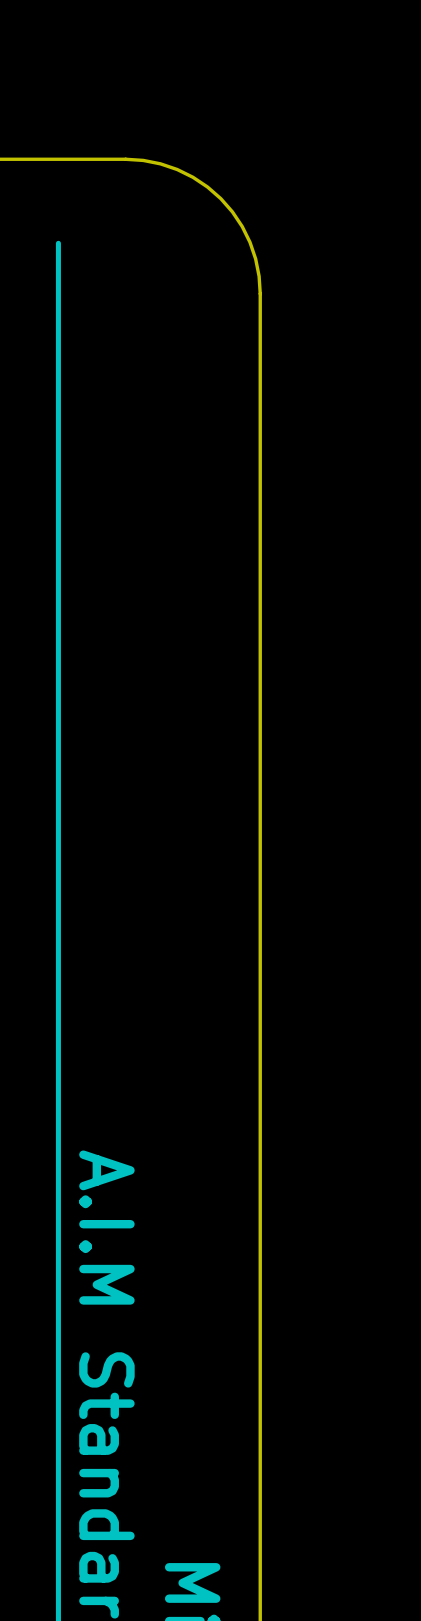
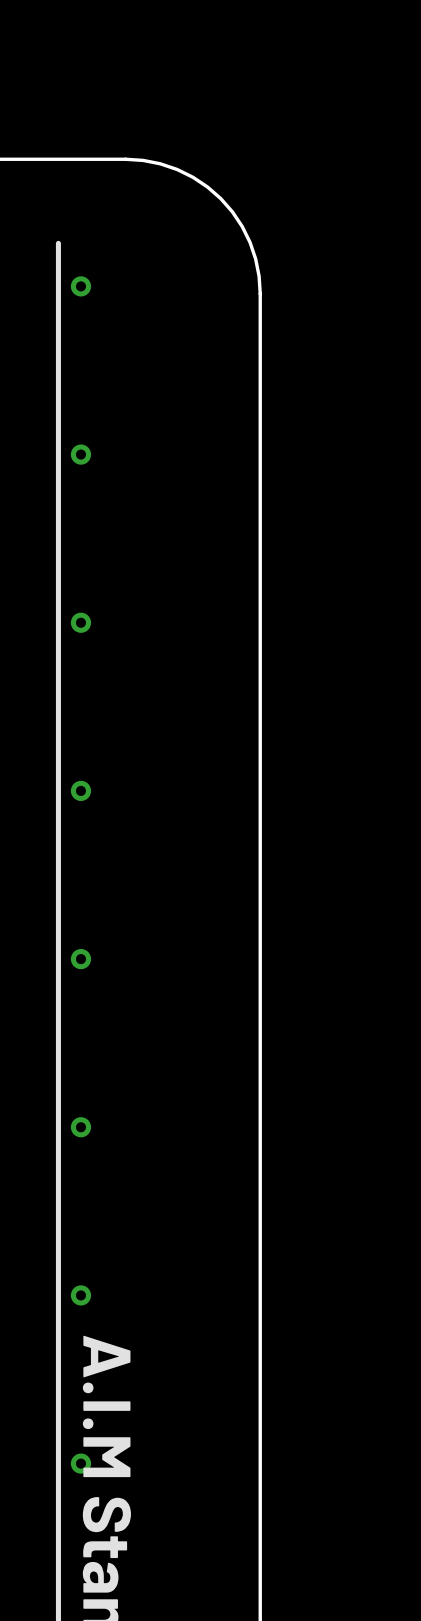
via: none -> (80, 286)
via: none -> (80, 454)
via: none -> (80, 622)
via: none -> (80, 790)
via: none -> (80, 959)
via: none -> (80, 1127)
via: none -> (80, 1295)
via: none -> (80, 1463)

